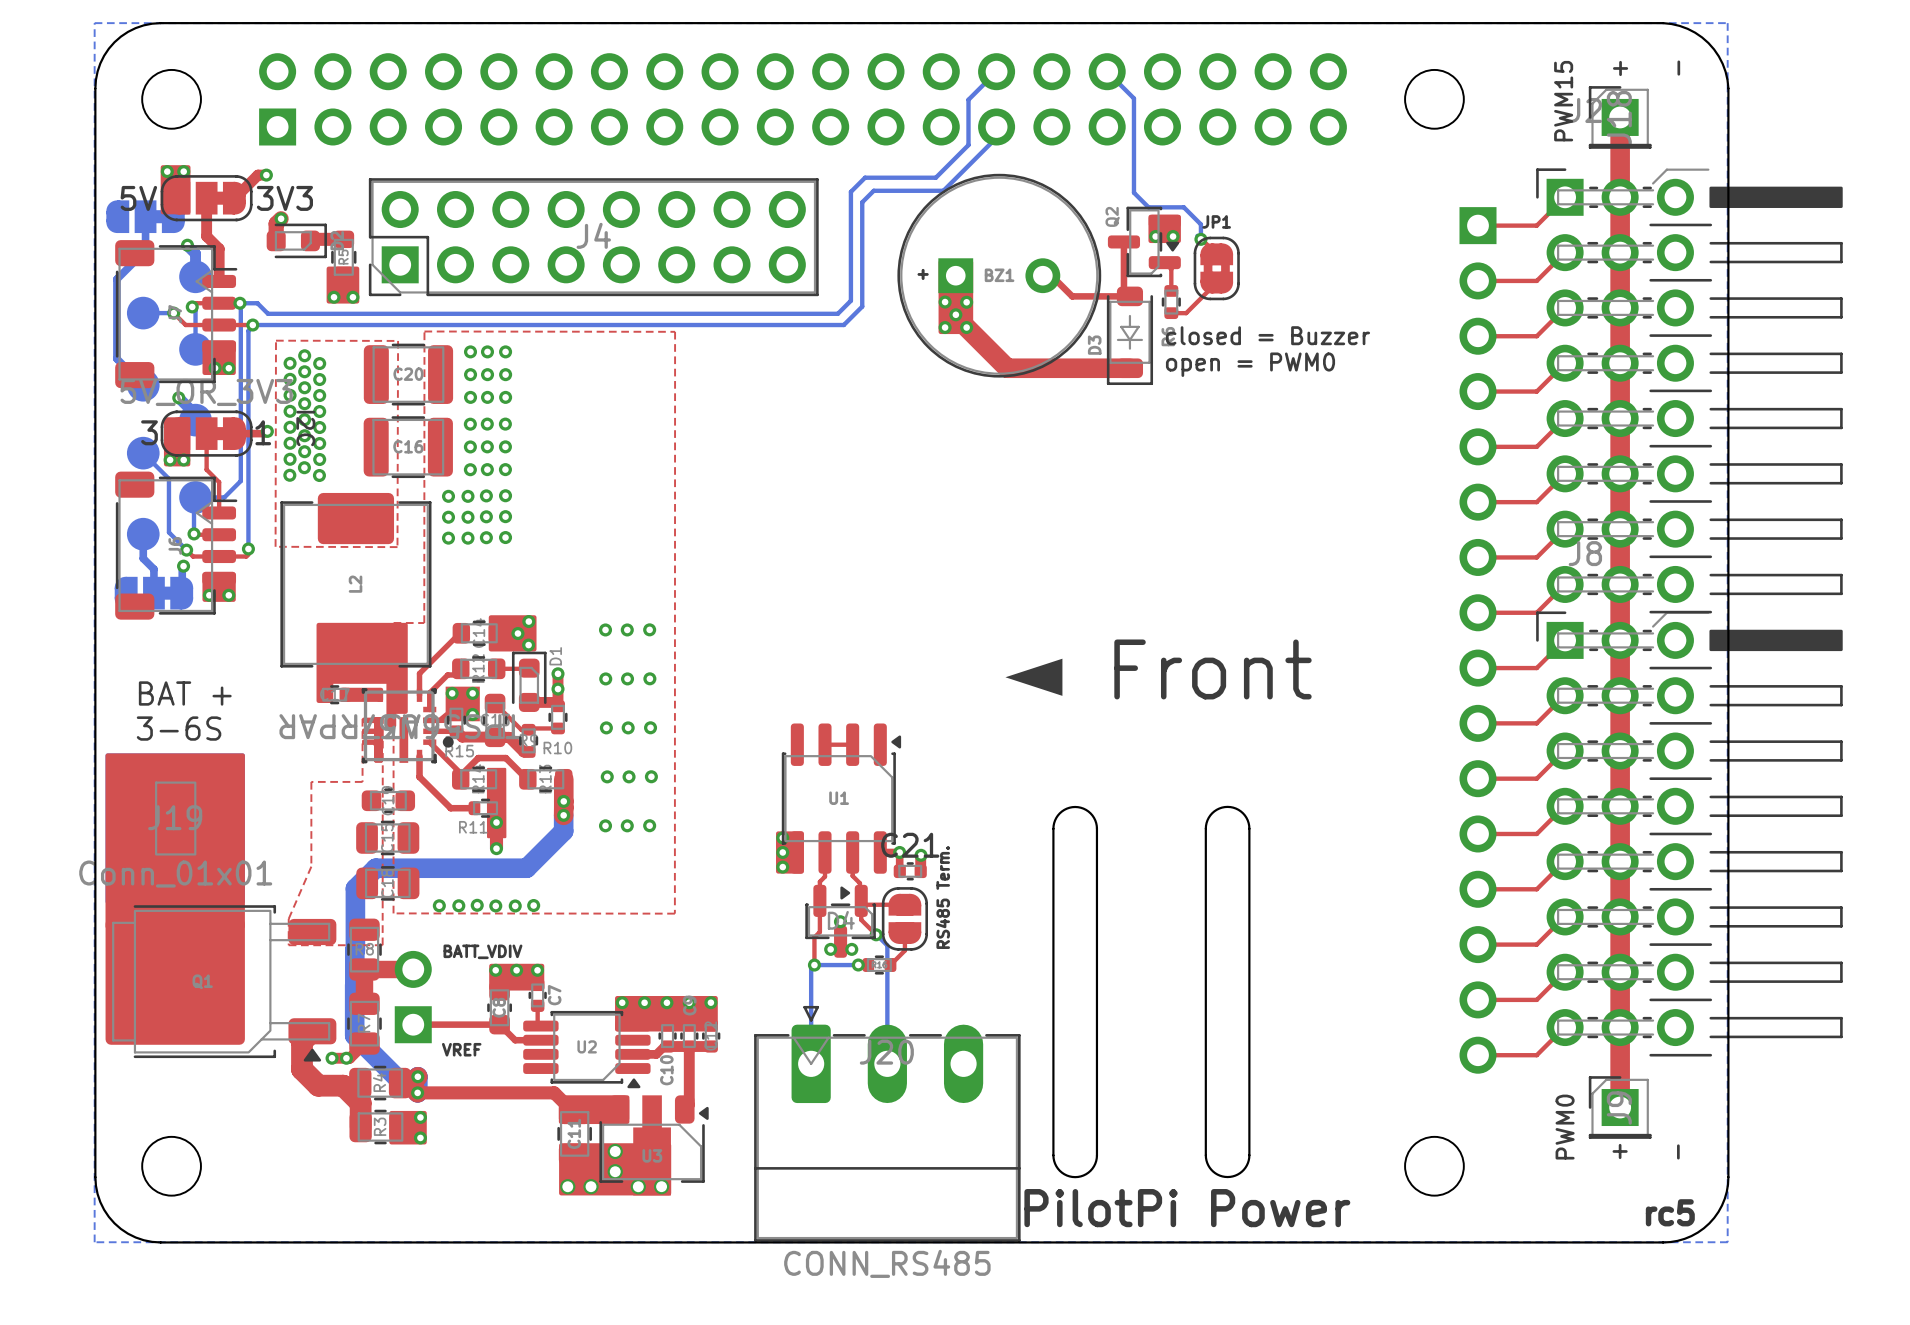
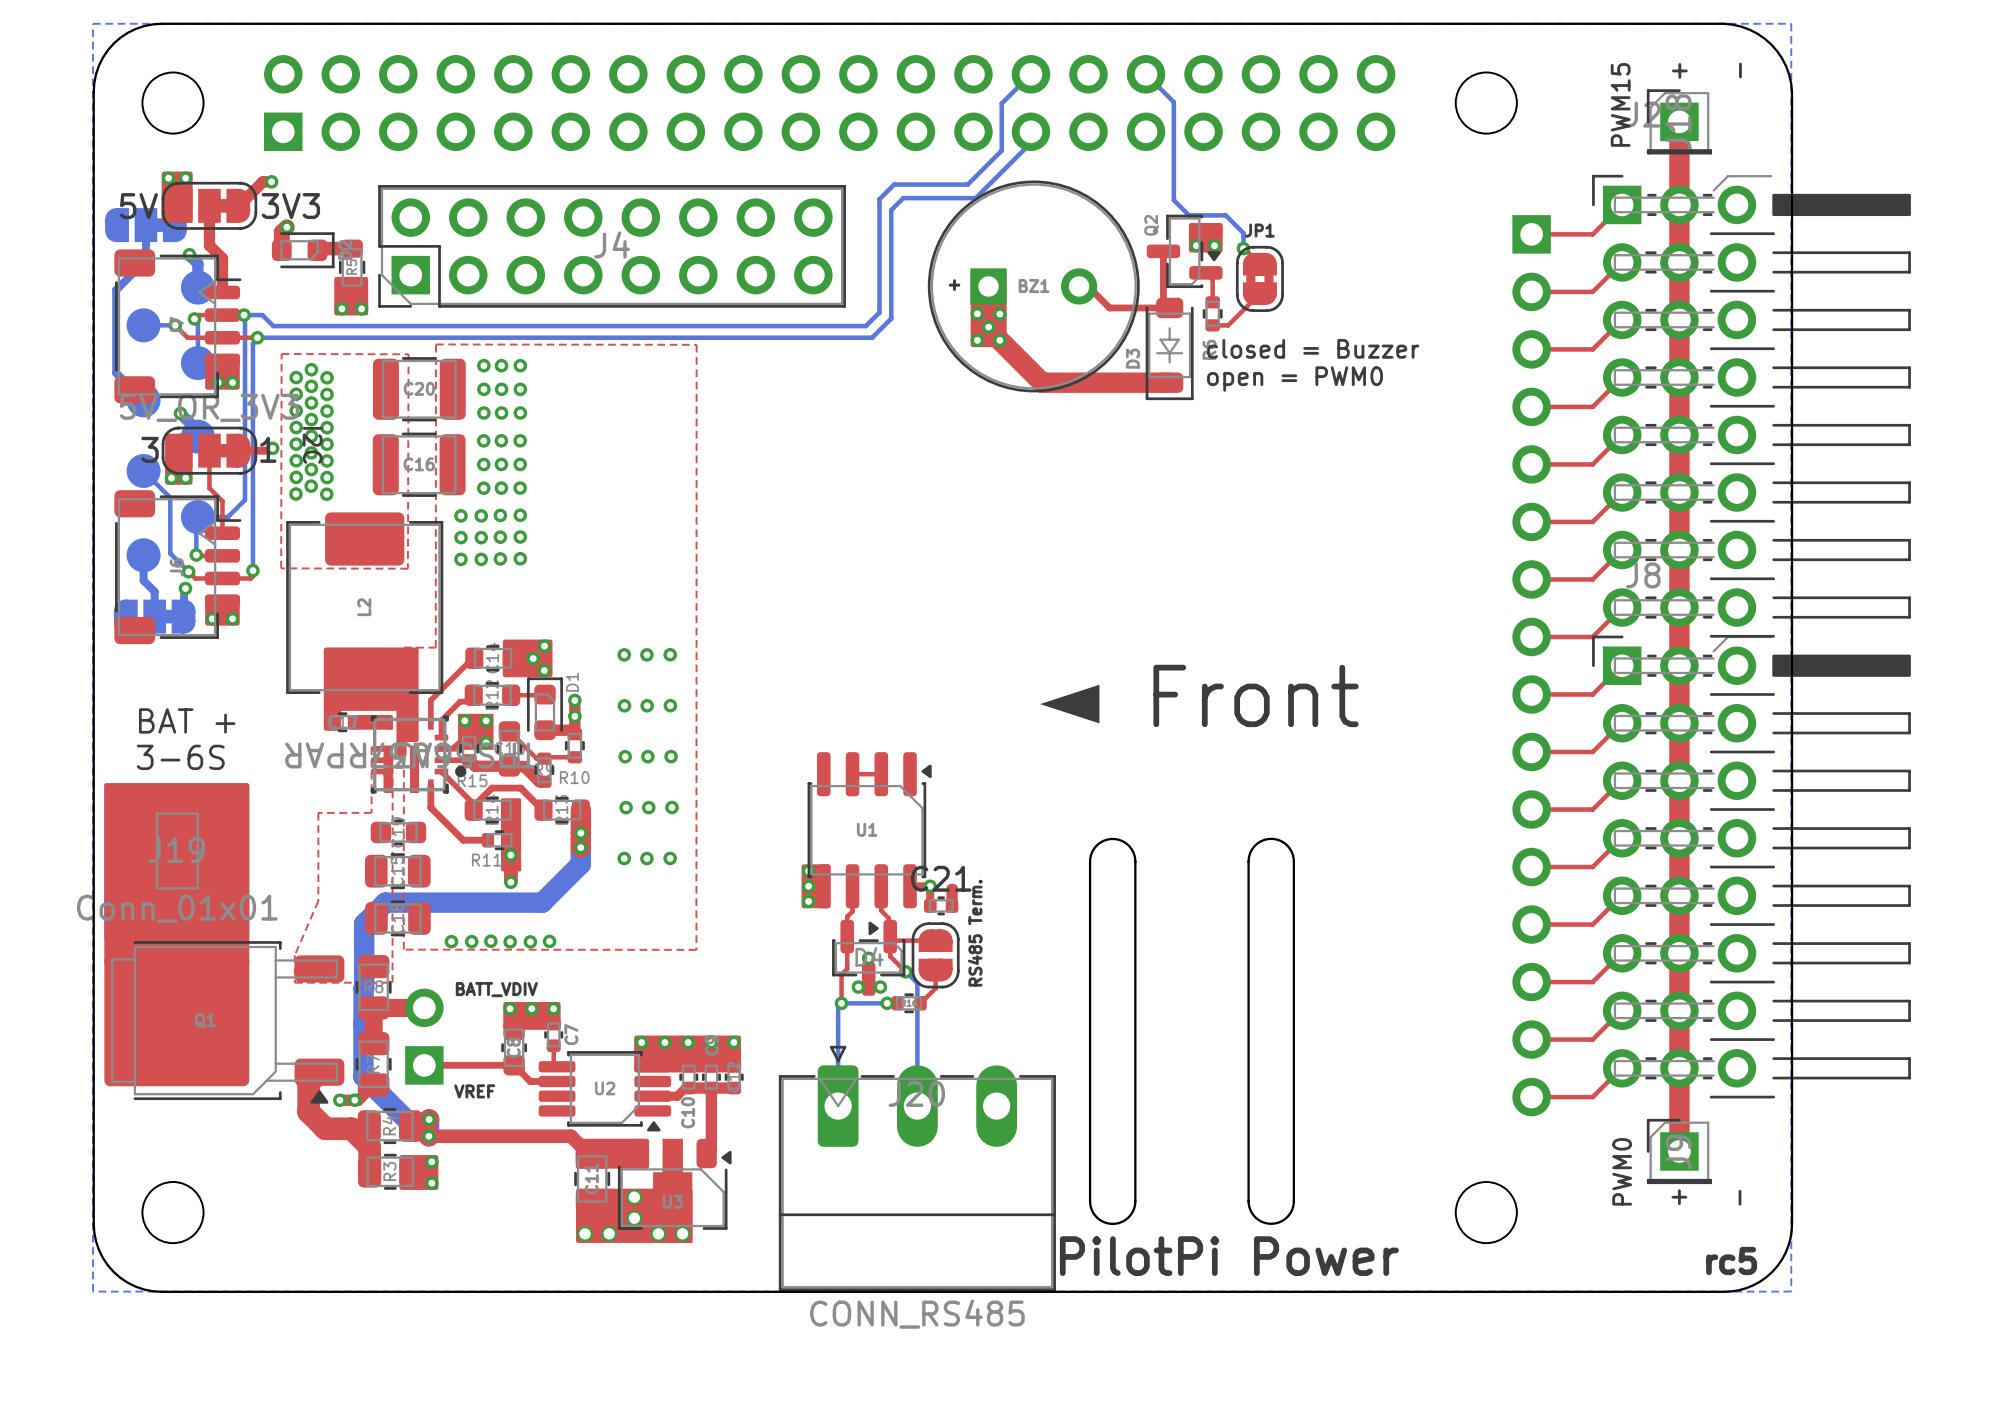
via: (921, 855) -> none

